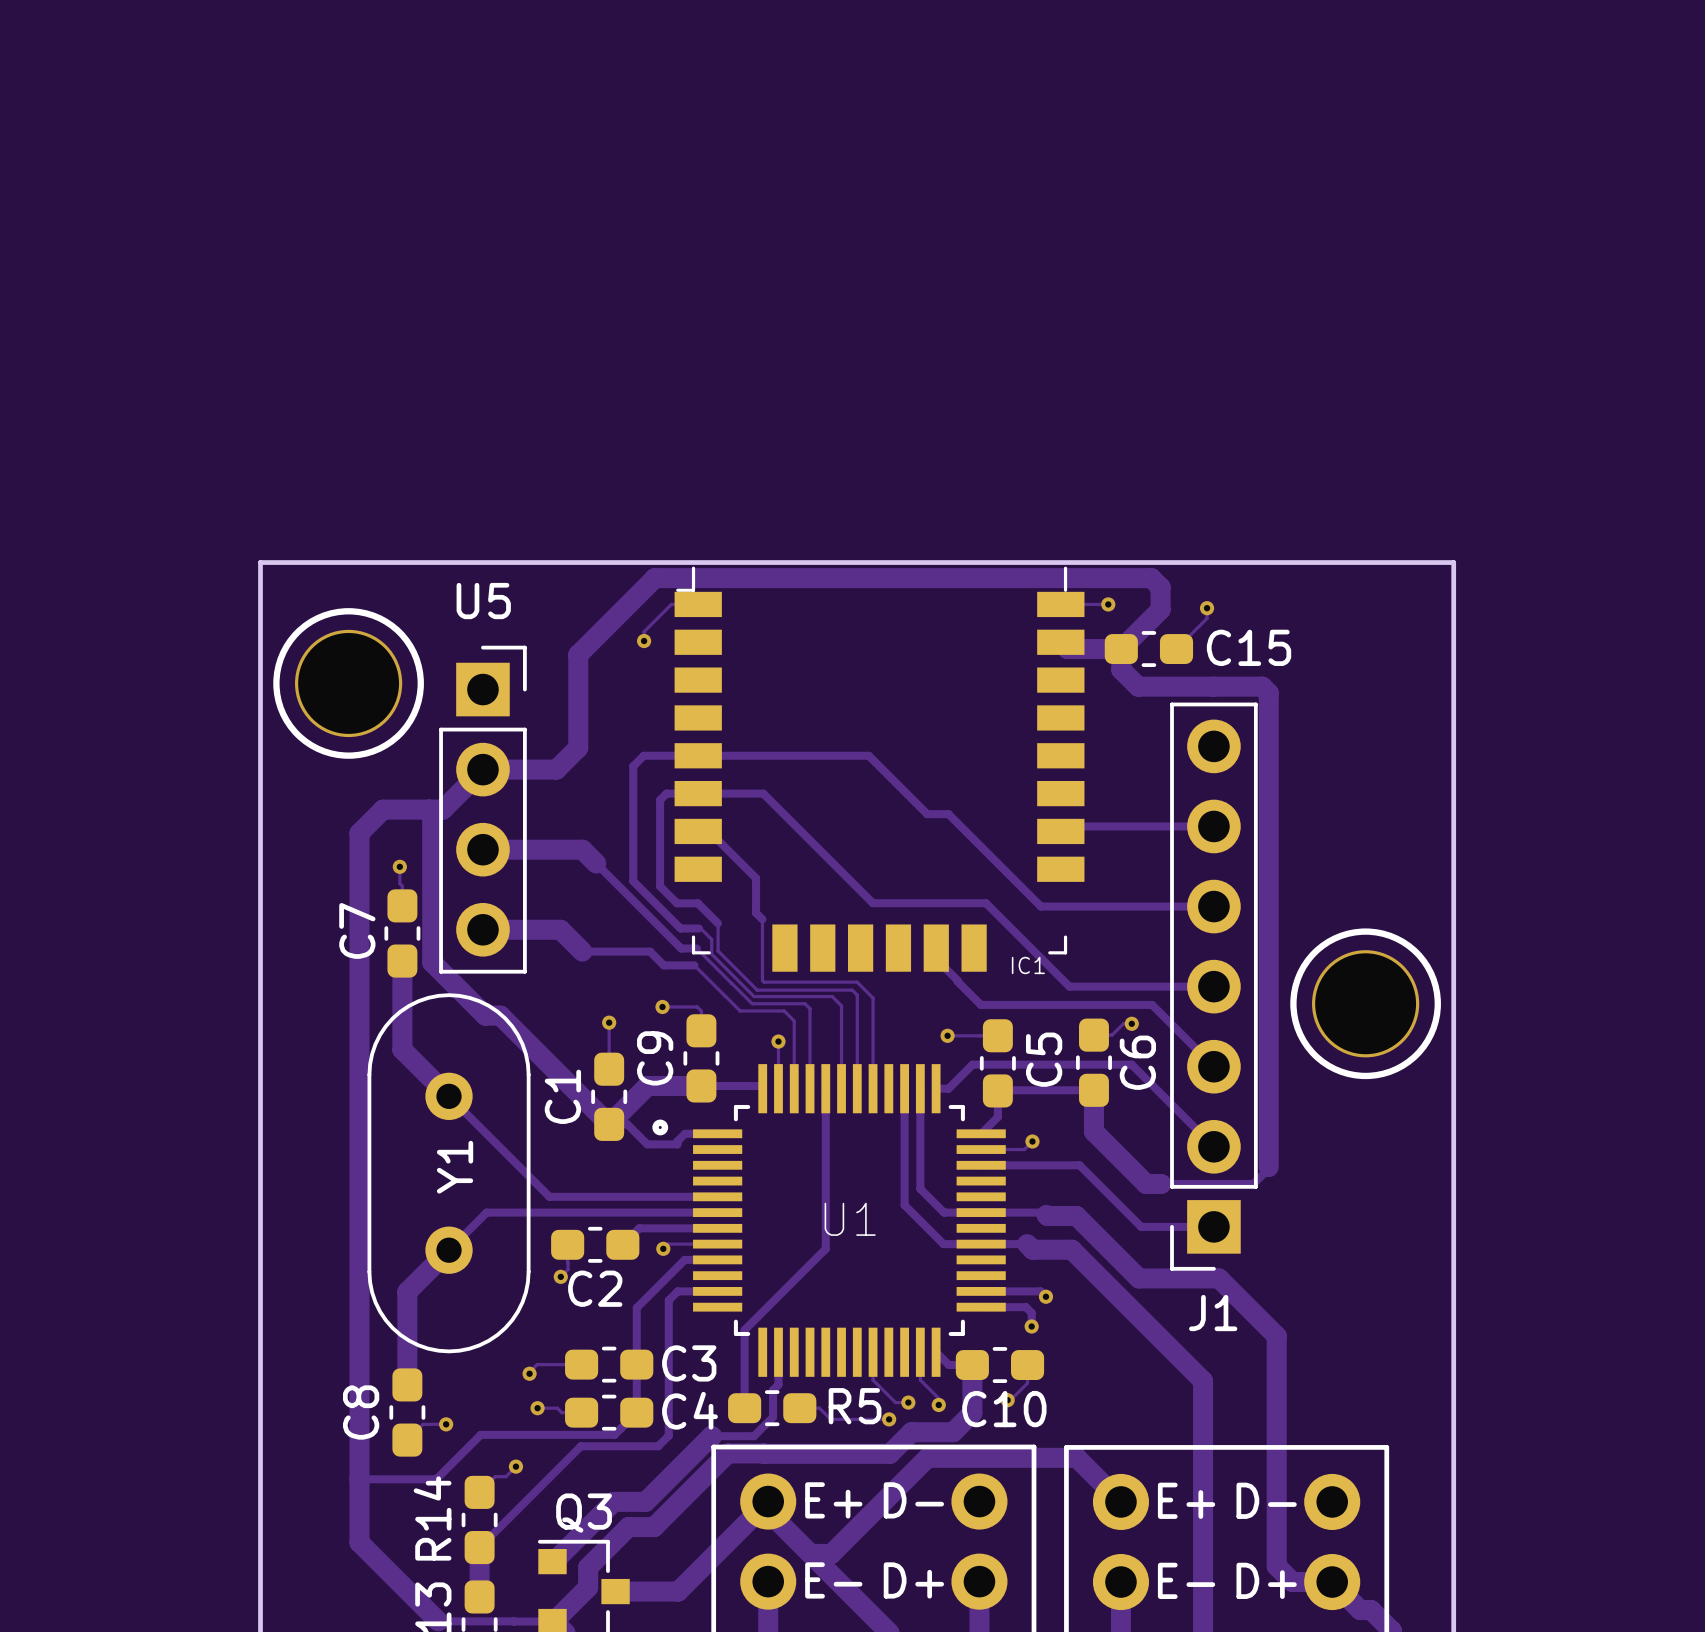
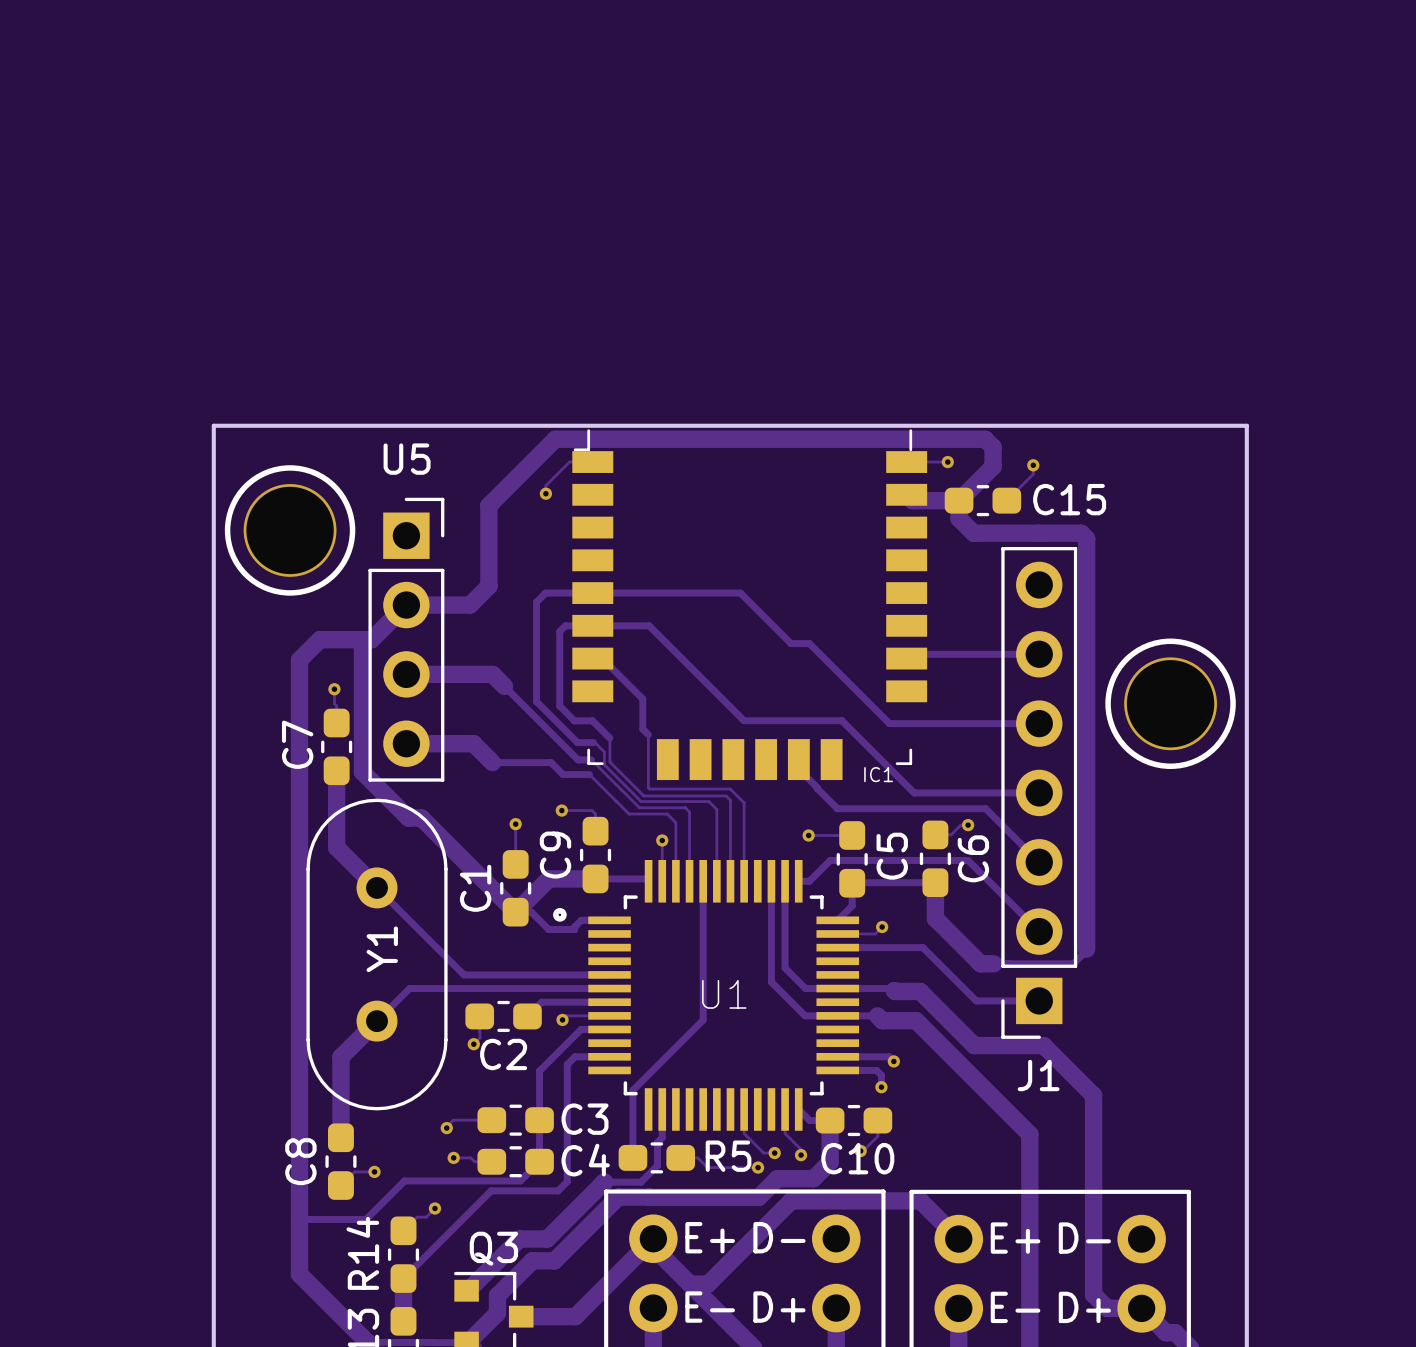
drawing position: (1365, 1003) -> (1170, 703)
via position: (1365, 1003) -> (1170, 703)

